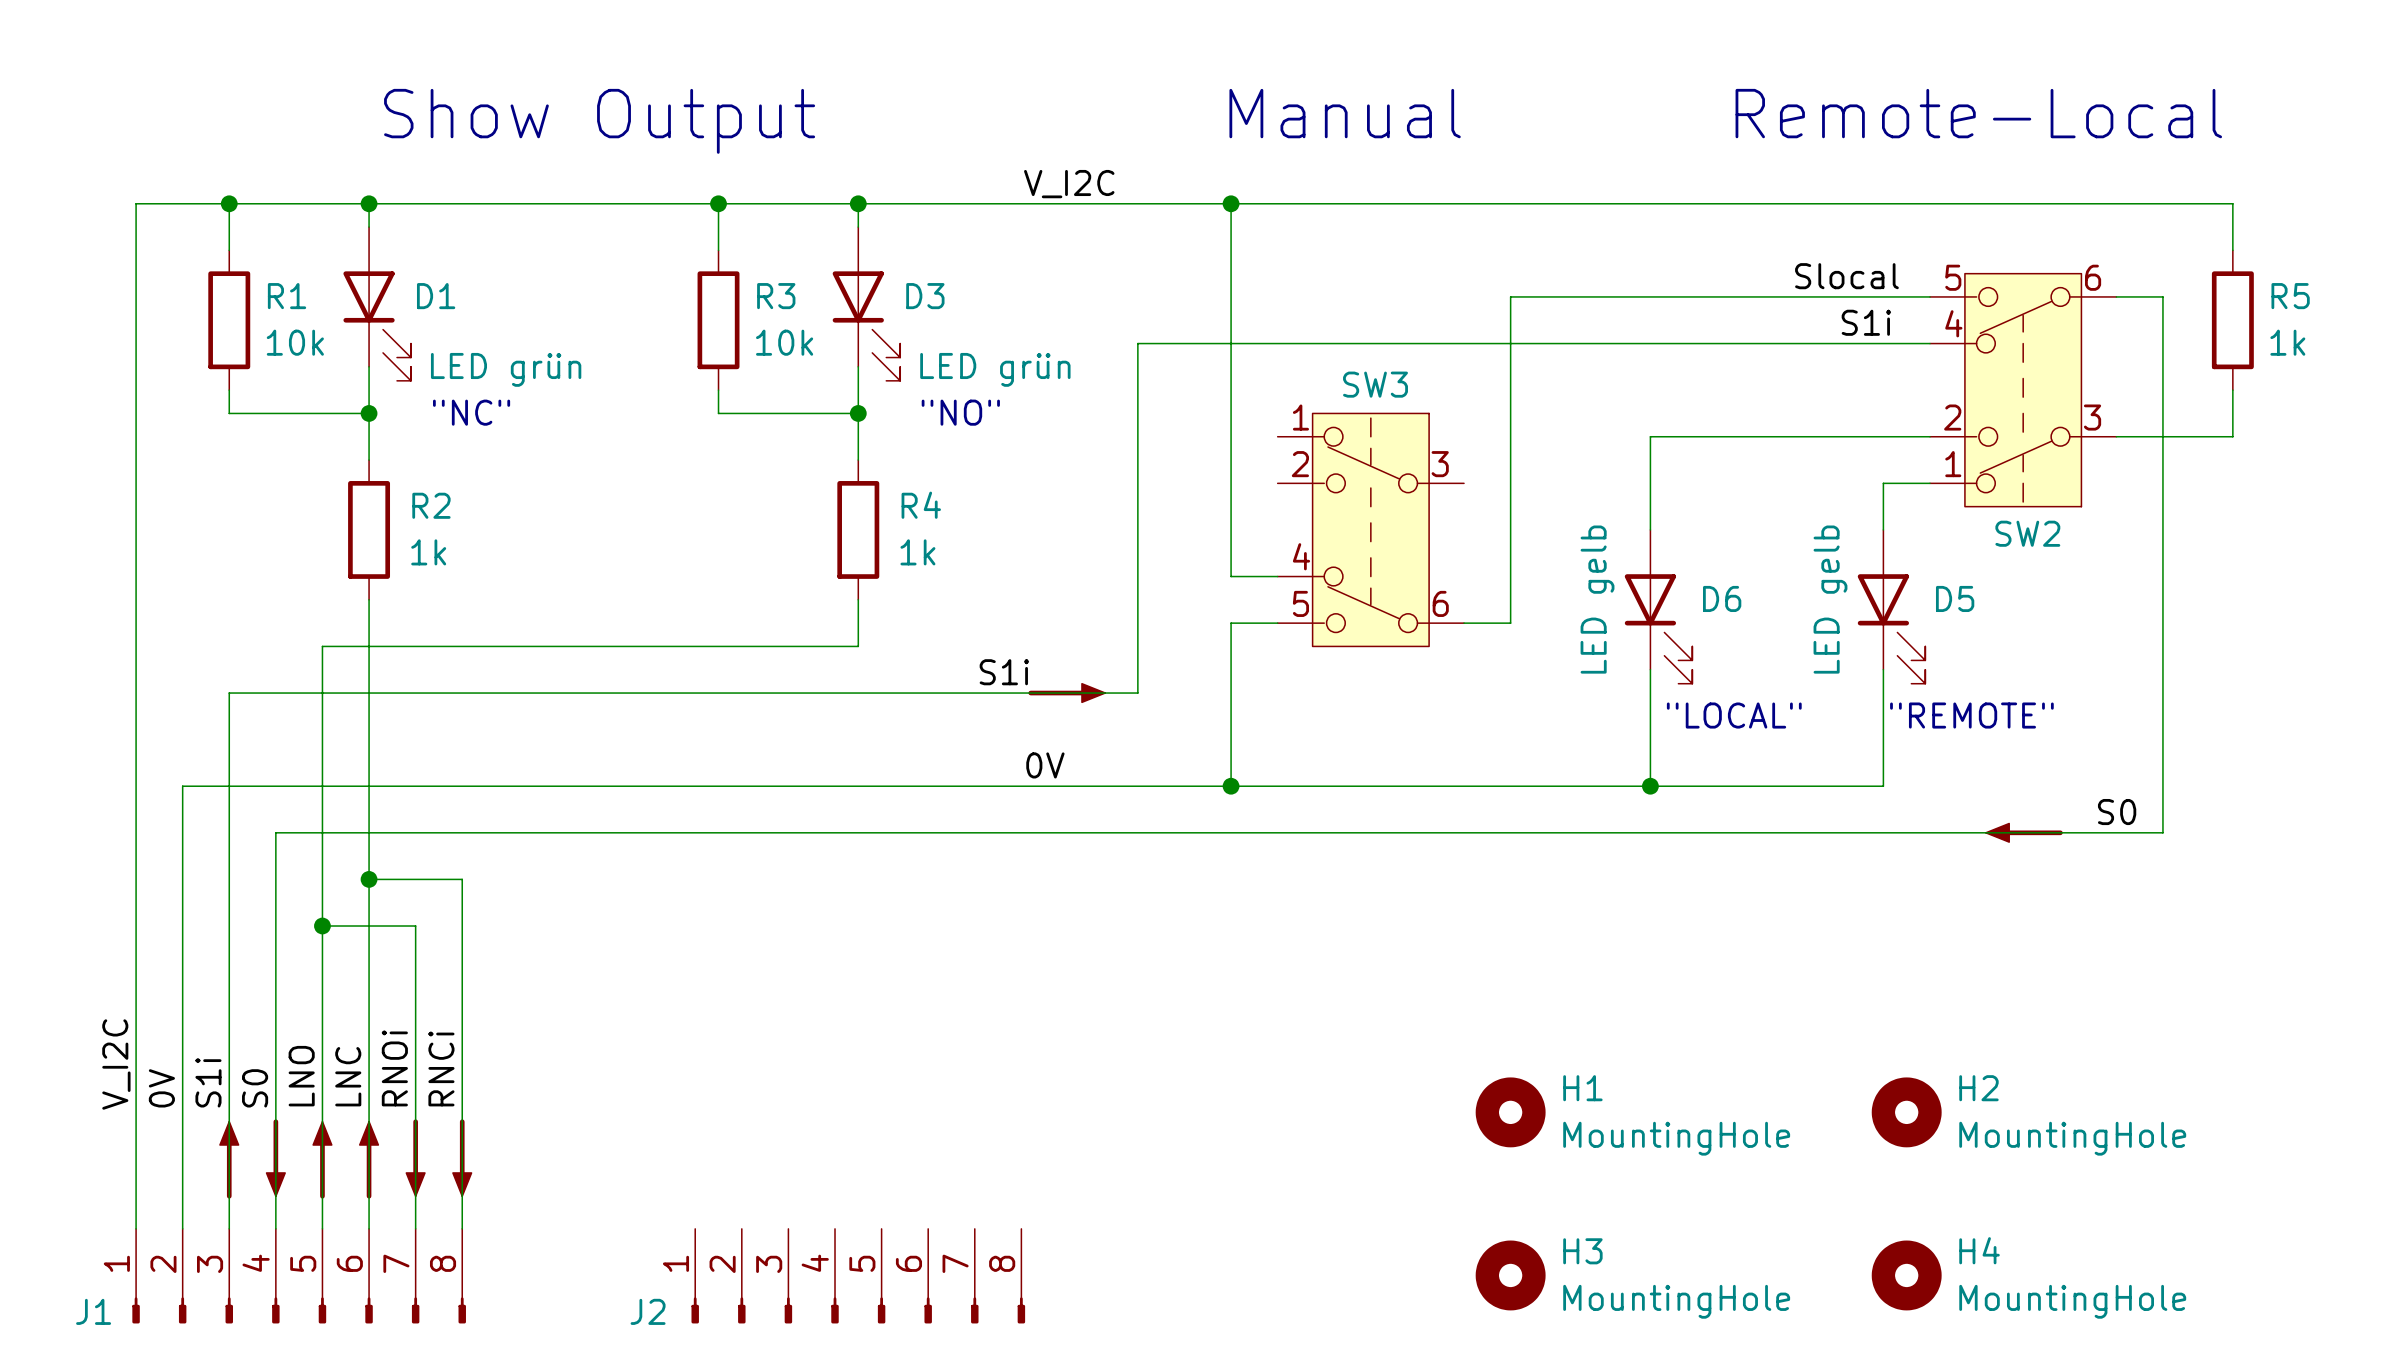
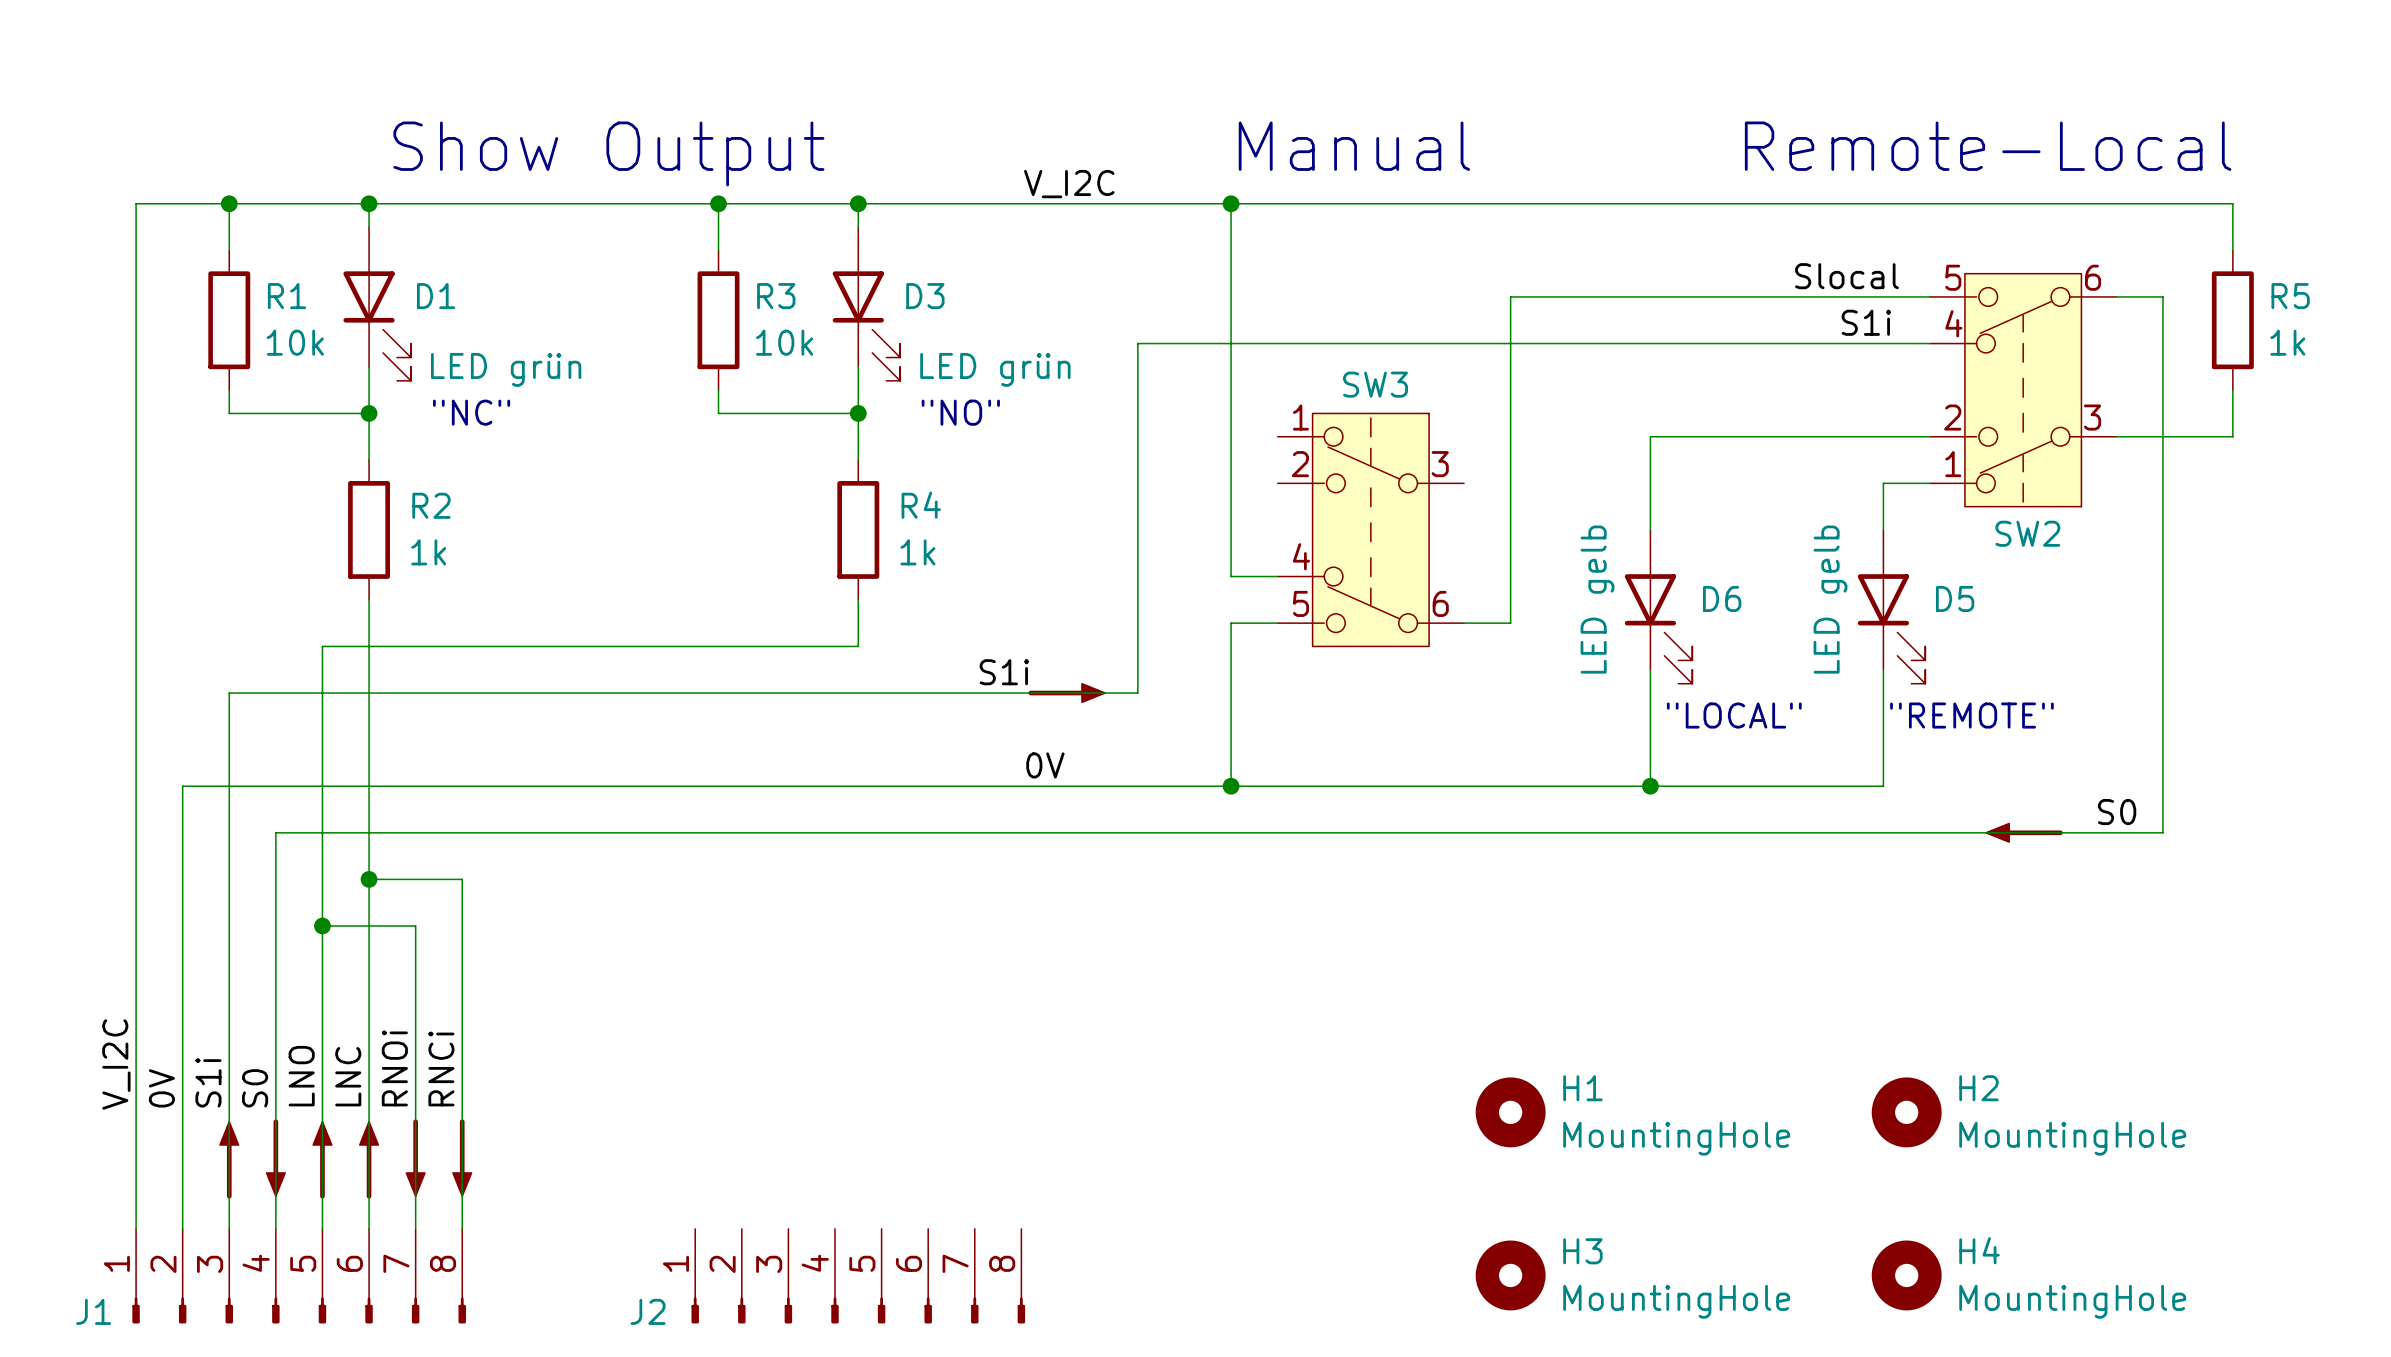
text position: Manual (1345, 113) -> Manual (1354, 146)
text position: Remote-Local (1978, 113) -> Remote-Local (1988, 146)
text position: Show Output (599, 121) -> Show Output (608, 153)

